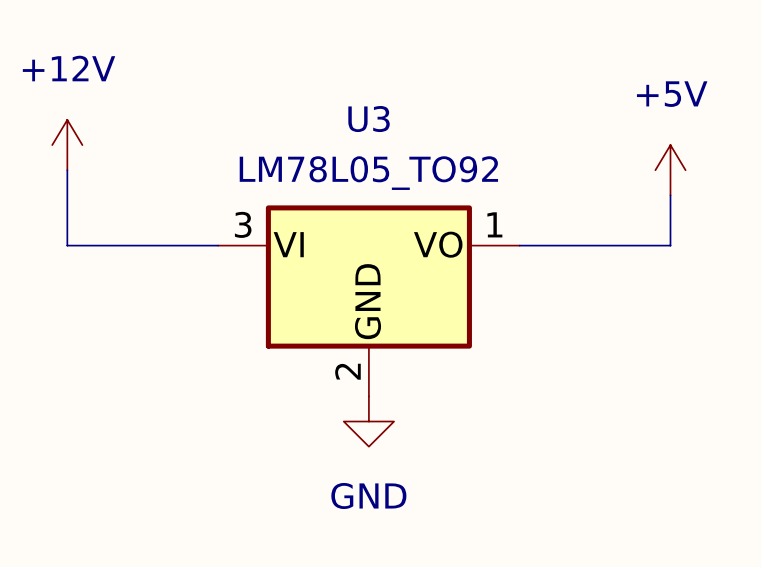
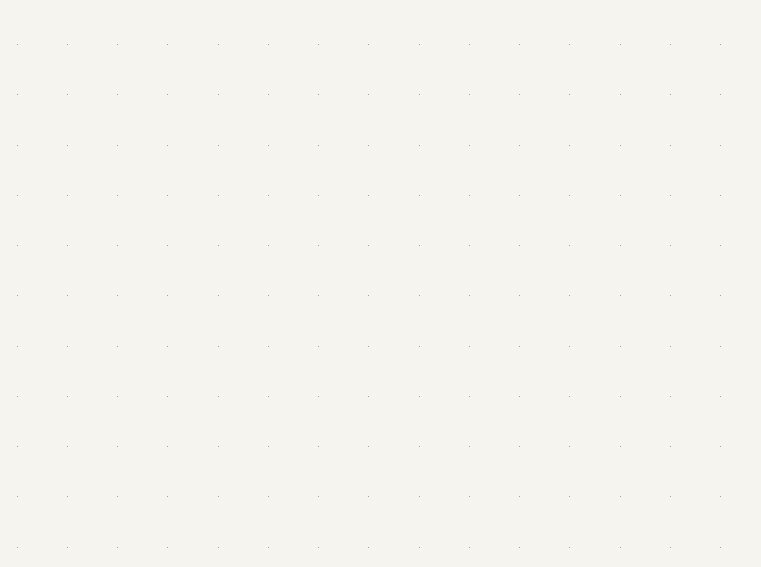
power symbol: +12V (67, 145) -> none
wire: (67, 170) (67, 245) (218, 245) -> none
power symbol: +5V (670, 170) -> none
wire: (670, 195) (670, 245) (519, 245) -> none
U3: LM78L05_TO92 (368, 300) -> none
power symbol: GND (368, 421) -> none

